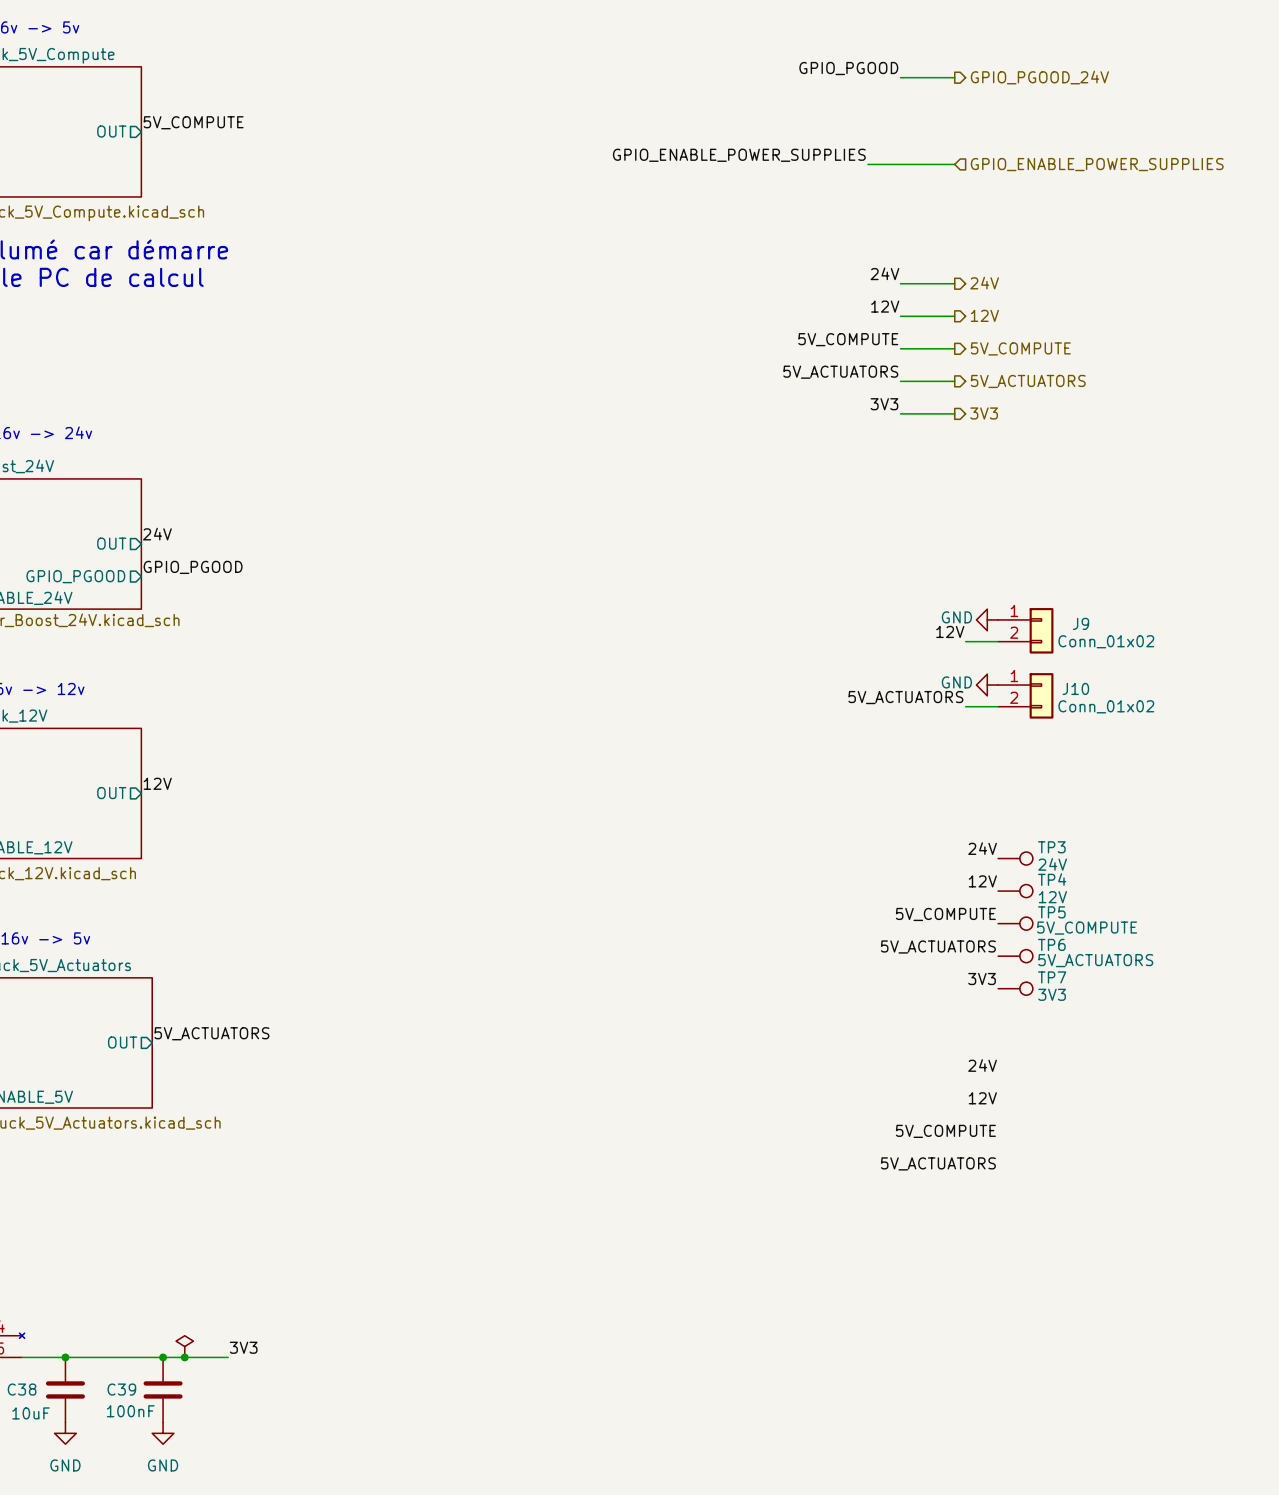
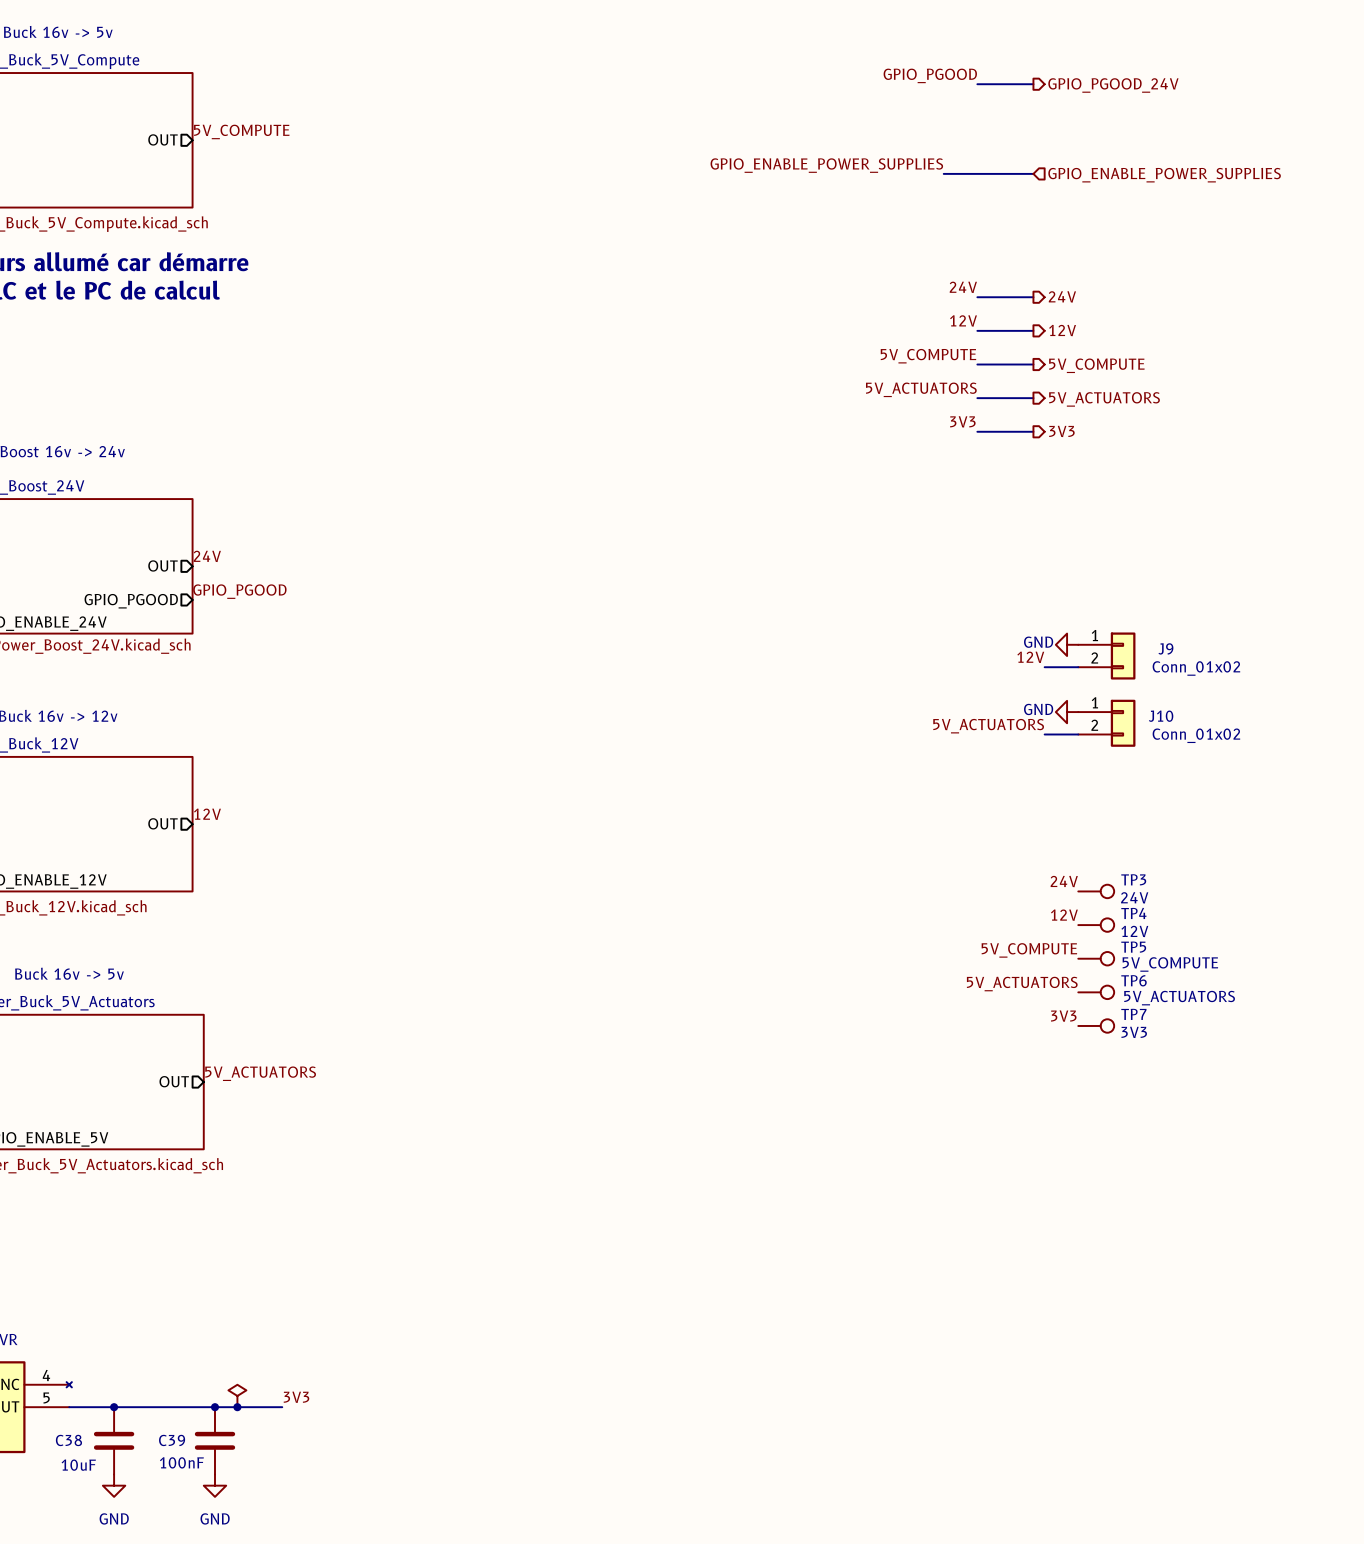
label: 24V (982, 1065) -> none
label: 12V (982, 1098) -> none
label: 5V_COMPUTE (945, 1131) -> none
label: 5V_ACTUATORS (938, 1163) -> none

